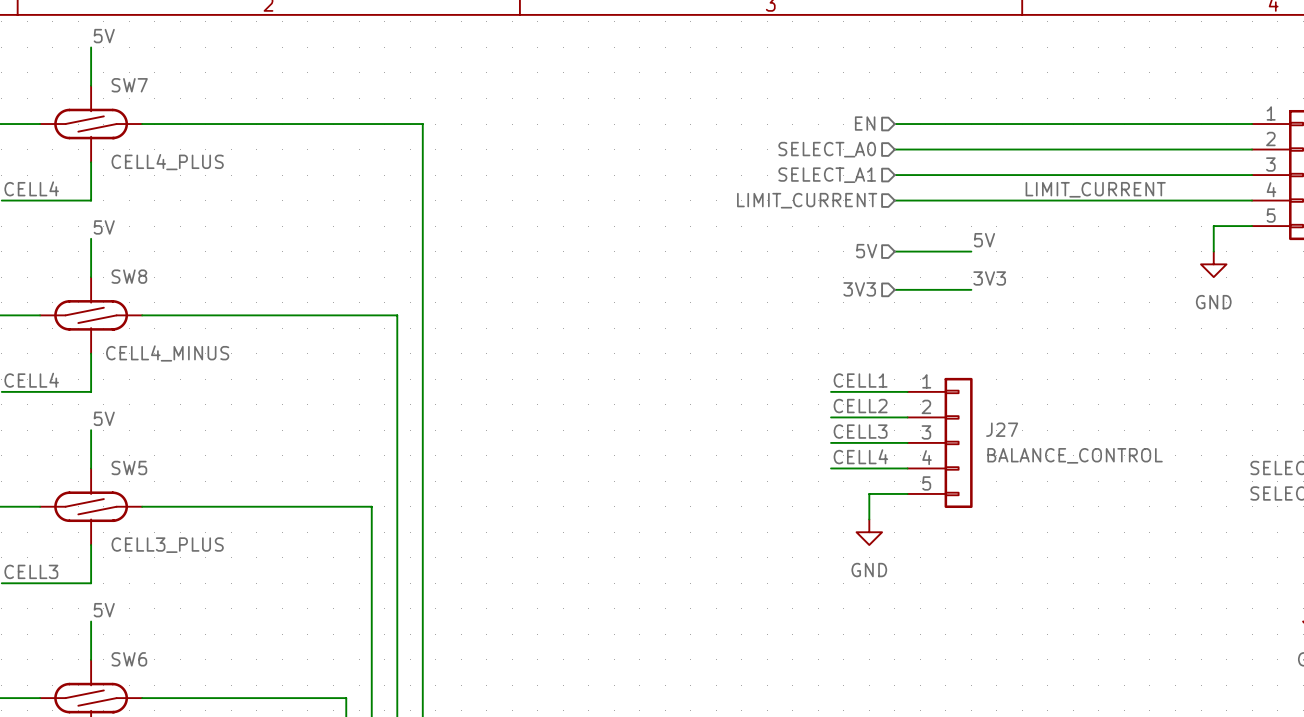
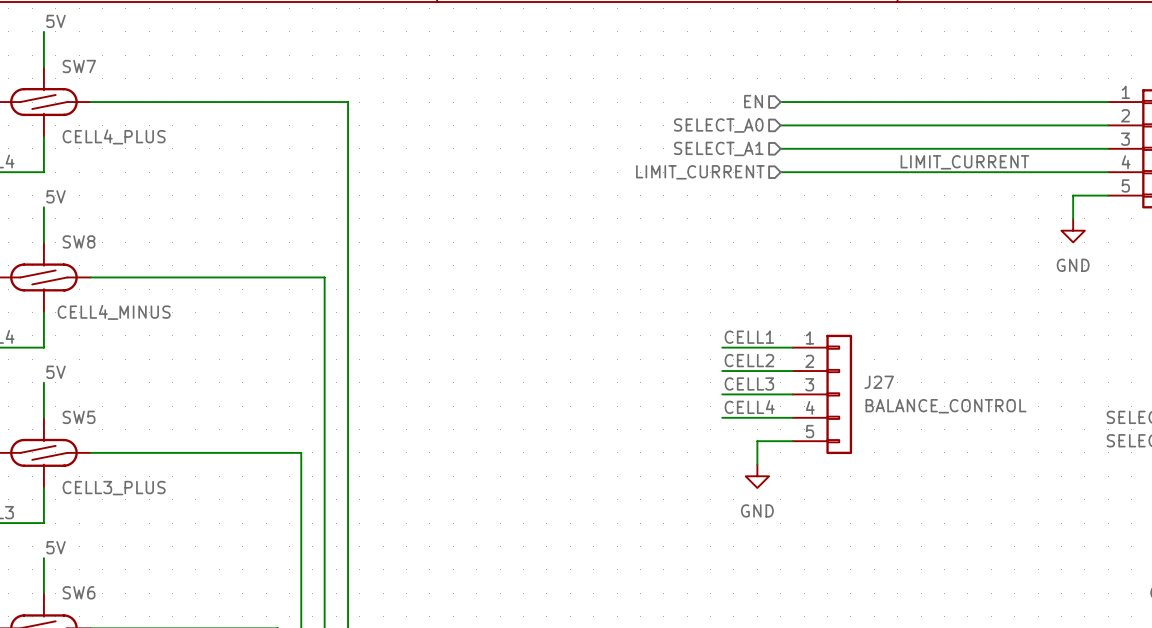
label: 5V (984, 240) -> none
hierarchical label: 5V (866, 251) -> none
wire: (894, 251) (971, 251) -> none
label: 3V3 (989, 278) -> none
hierarchical label: 3V3 (859, 289) -> none
wire: (894, 289) (971, 289) -> none

